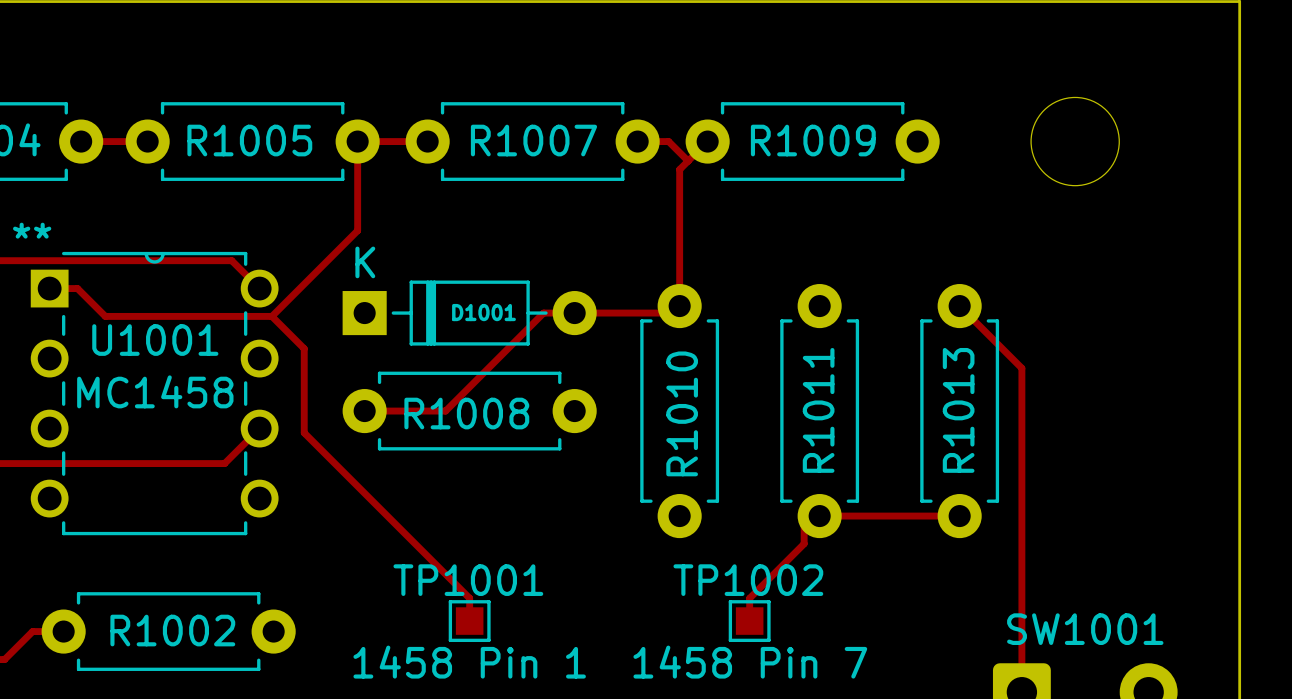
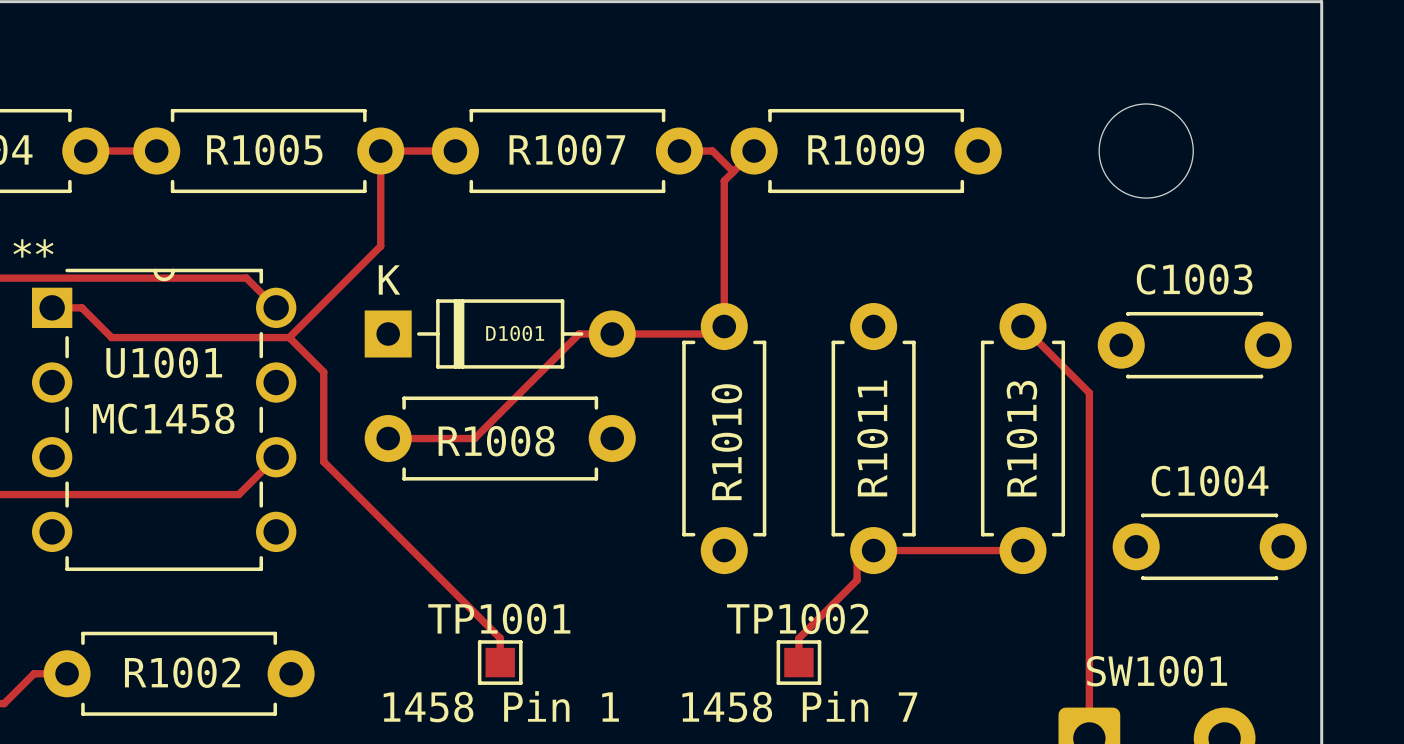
C1003: none -> (1194, 345)
C1004: none -> (1209, 546)

